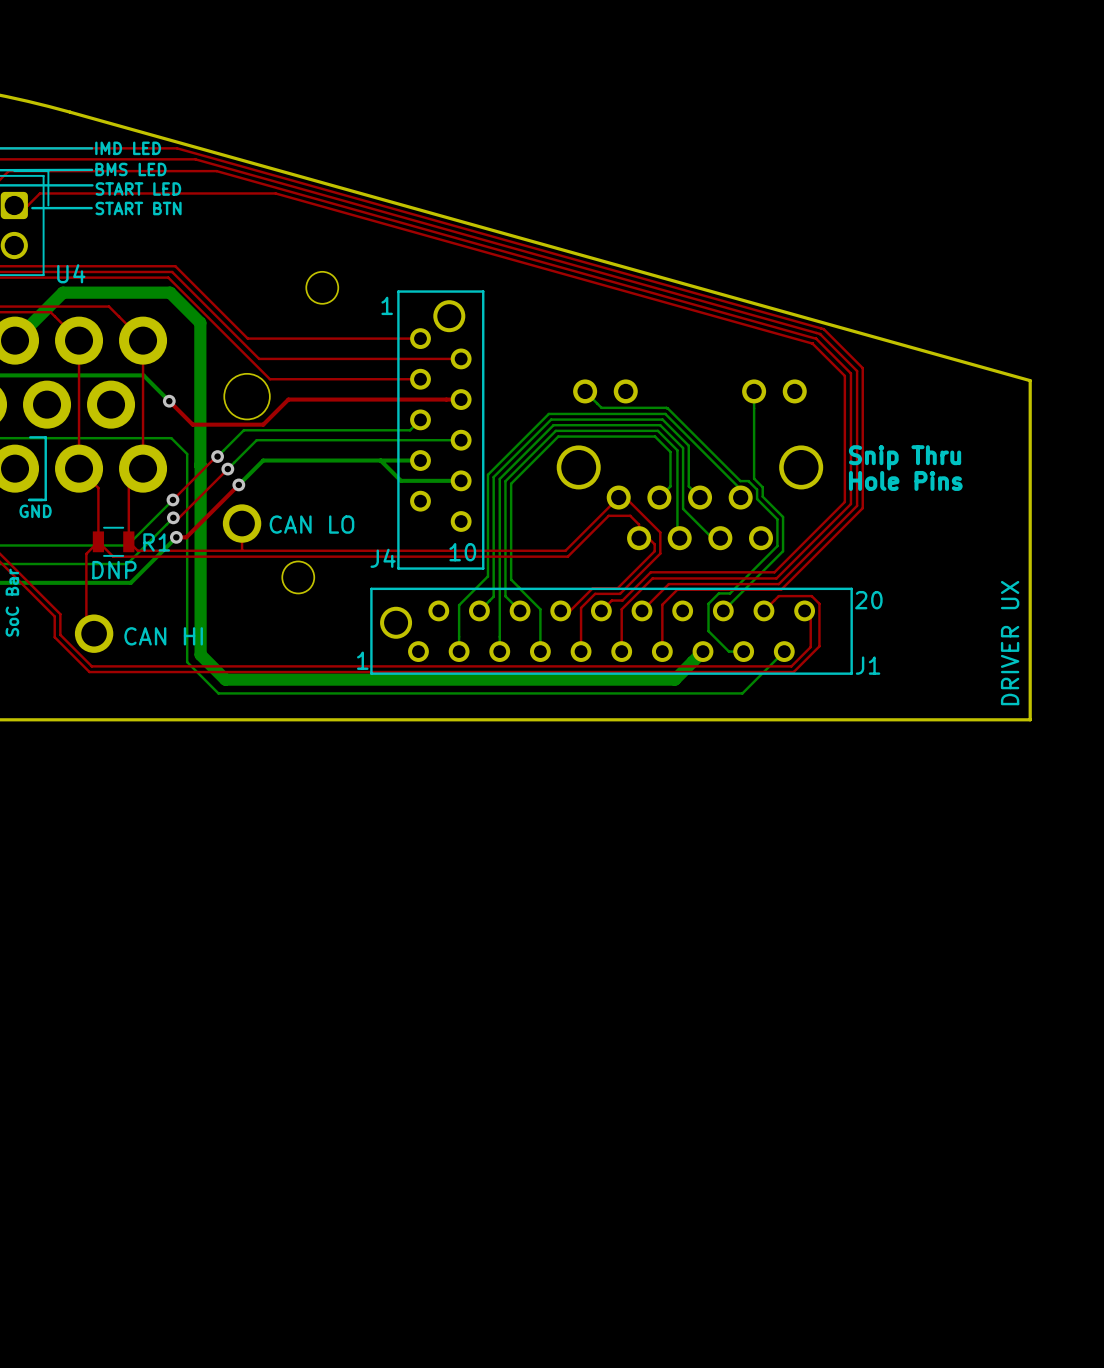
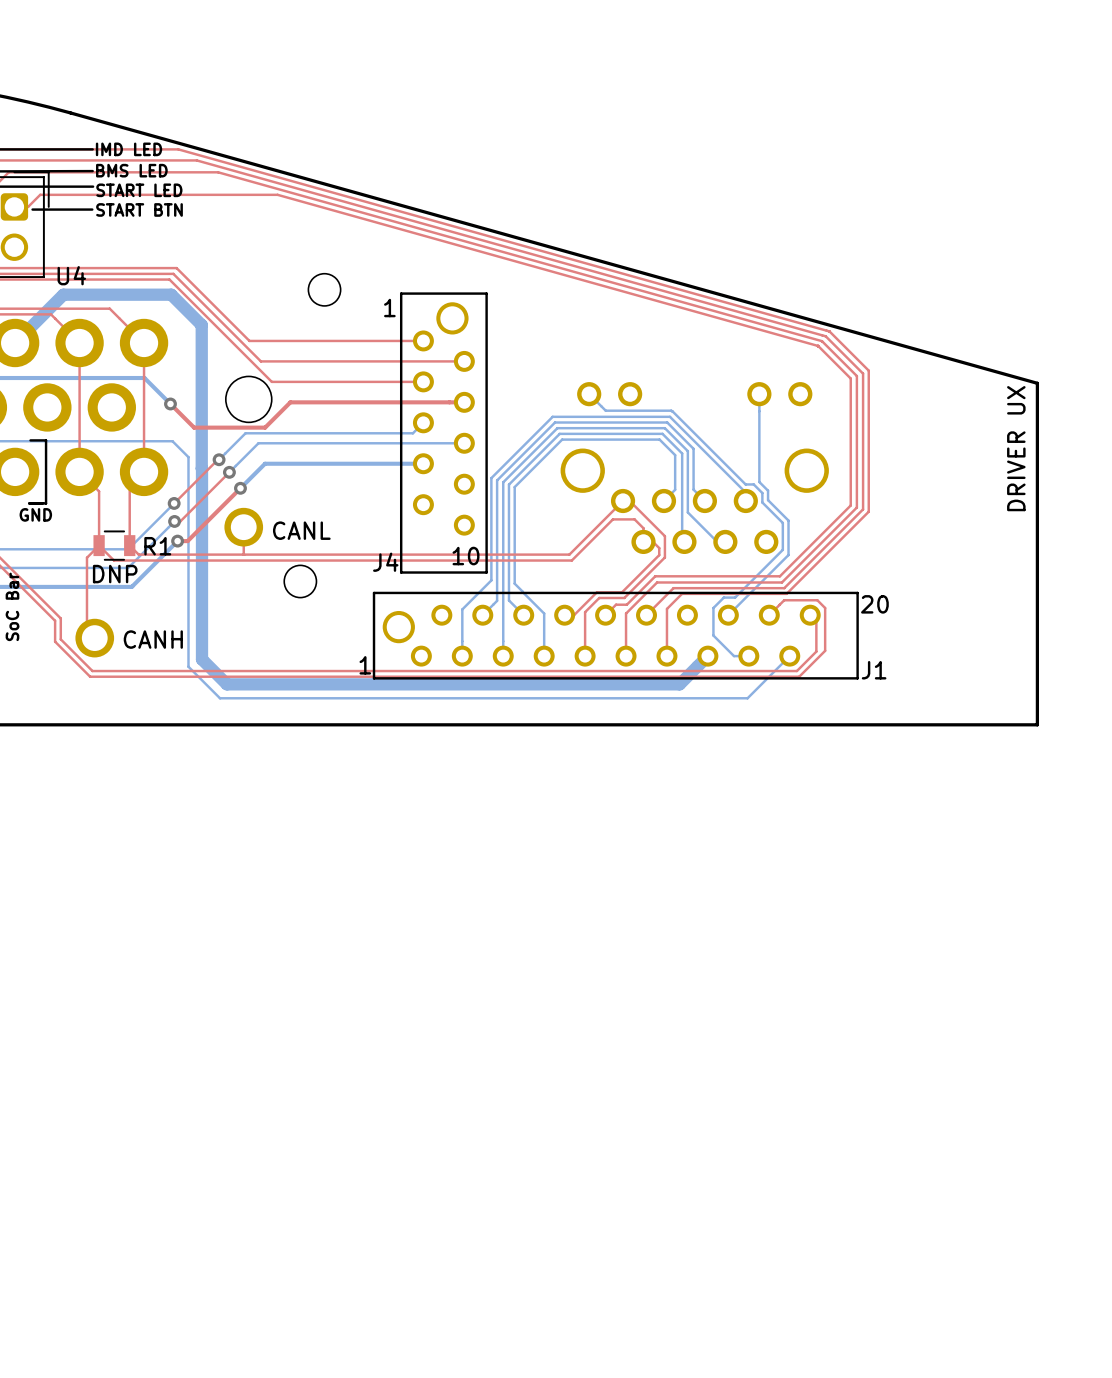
text: Snip Thru (905, 457) -> none
bottom track: (380, 460) (400, 480) (461, 480) -> none
text: Hole Pins (905, 480) -> none
CAN LO name: CAN LO (311, 524) -> CANL (301, 530)
CAN HI name: CAN HI (163, 636) -> CANH (153, 639)
text position: DRIVER UX (1010, 643) -> DRIVER UX (1016, 448)

